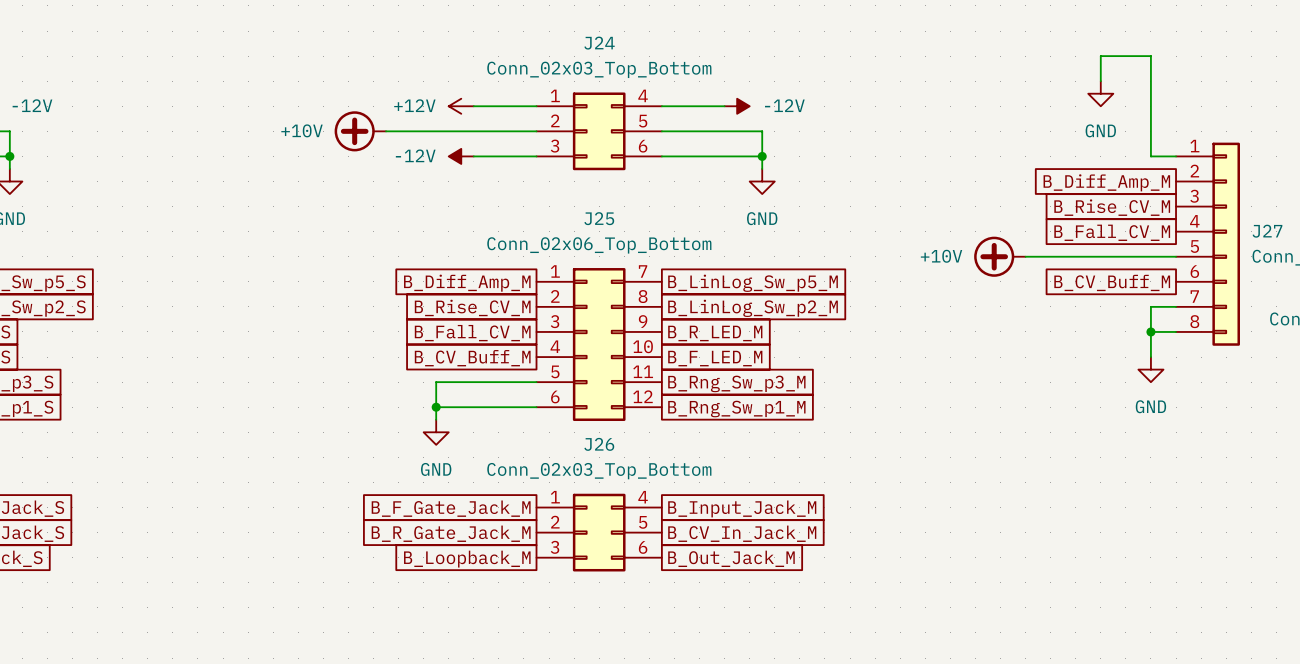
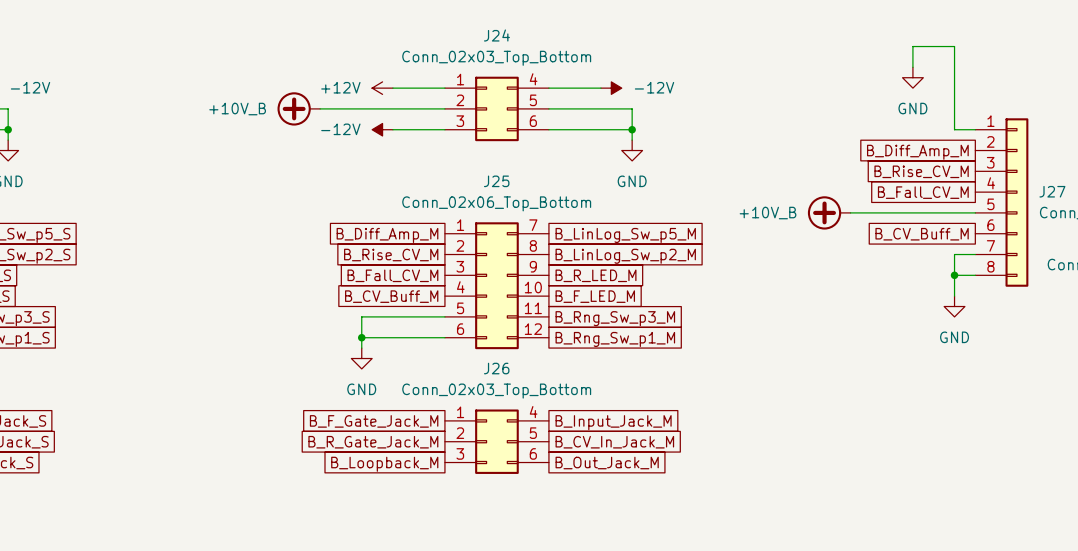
power symbol: +10V (360, 131) -> +10V_B (298, 108)
power symbol: +10V (999, 256) -> +10V_B (829, 212)

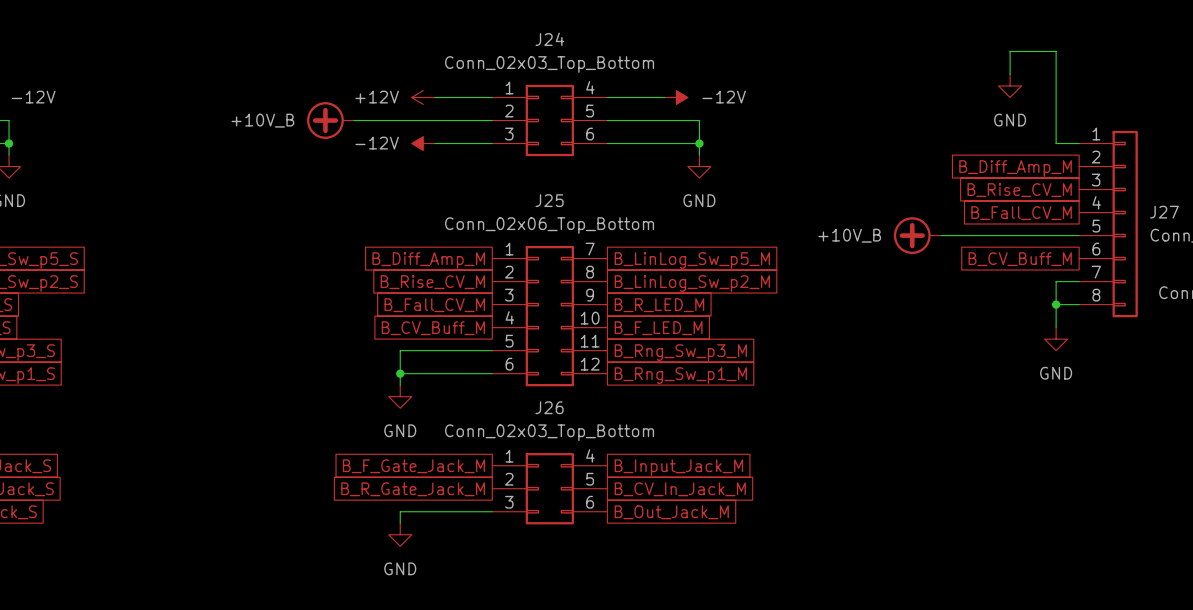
wire: none -> (492, 511) (400, 511) (400, 523)
global label: B_Loopback_M (384, 464) -> none
power symbol: none -> GND (400, 534)

